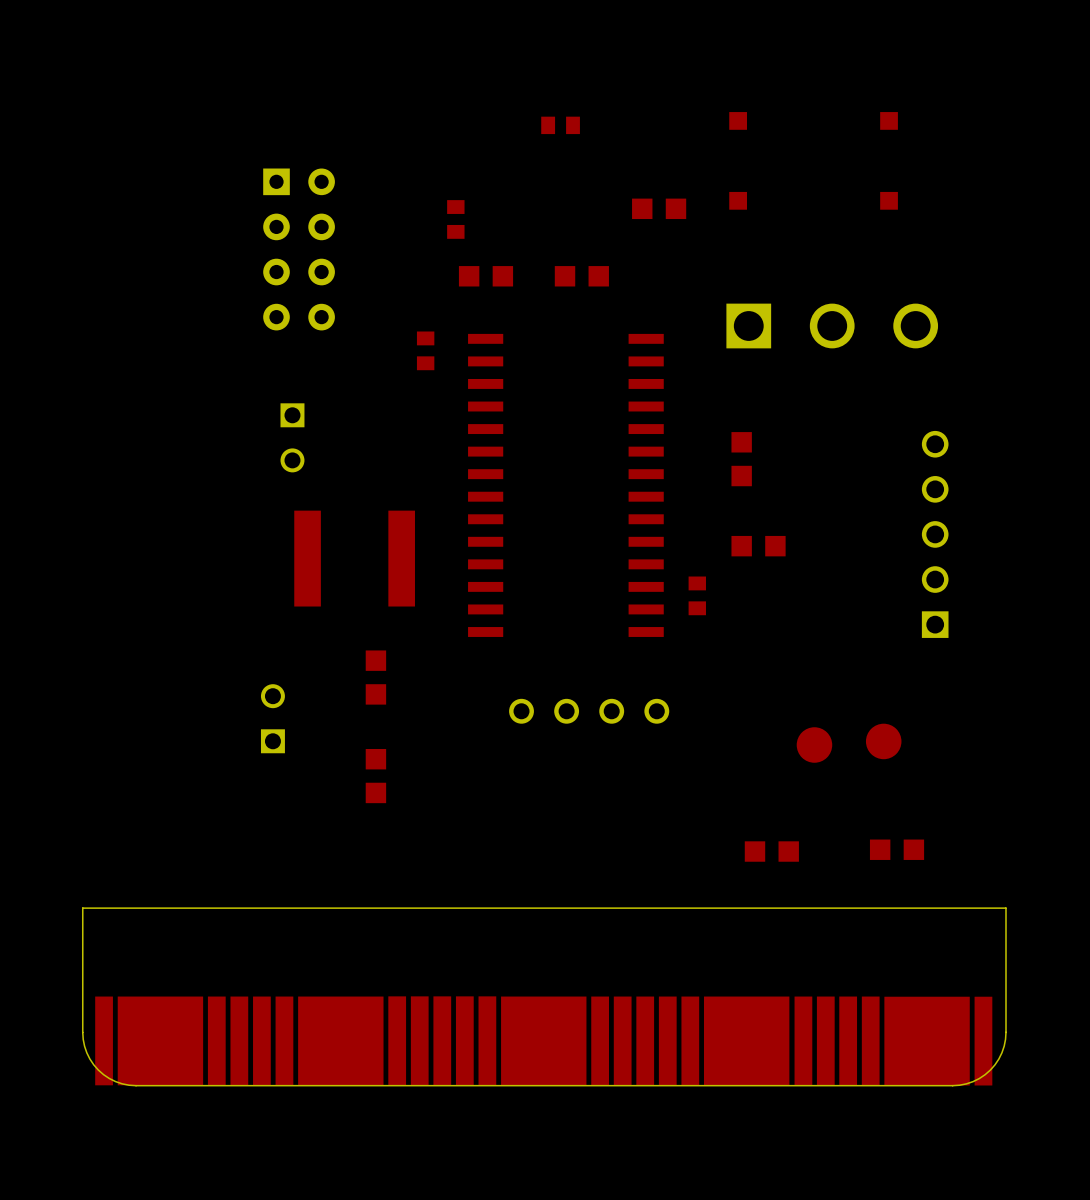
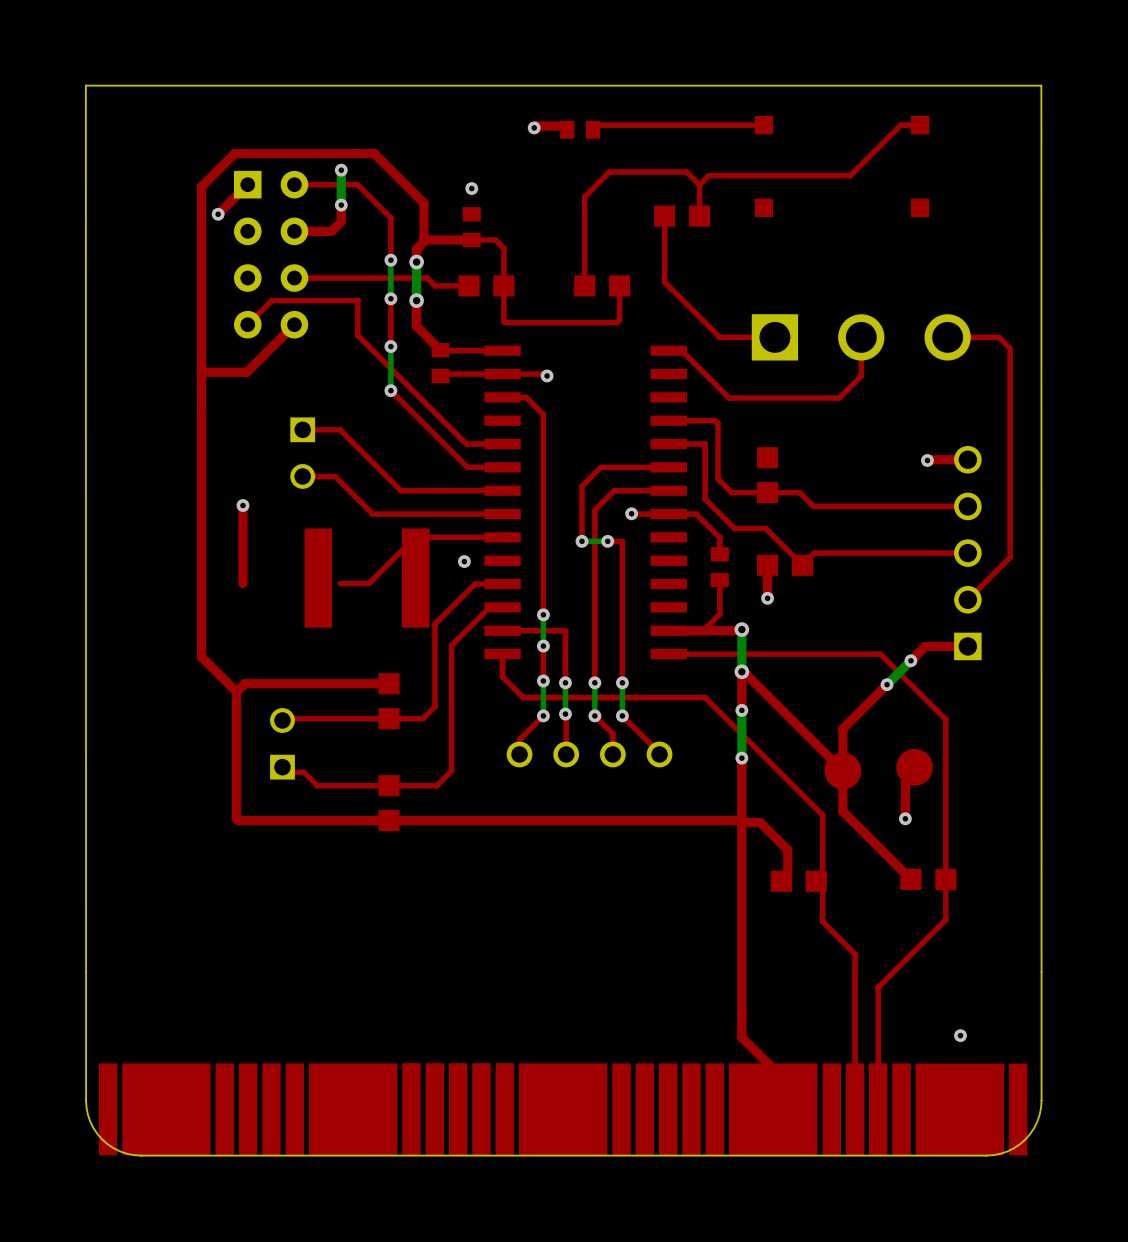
top track: none -> (763, 125) (593, 126)
top track: none -> (920, 125) (900, 125) (850, 175) (708, 175) (699, 184)
top track: none -> (567, 126) (536, 126) (534, 127)
via: none -> (534, 127)
bottom track: none -> (341, 170) (341, 205)
via: none -> (341, 170)
top track: none -> (247, 184) (218, 214)
top track: none -> (294, 184) (357, 184) (390, 217) (390, 260)
top track: none -> (699, 184) (686, 172) (609, 172) (584, 196) (584, 285)
top track: none -> (699, 184) (699, 216)
via: none -> (471, 188)
top track: none -> (341, 205) (341, 221) (331, 231) (294, 231)
via: none -> (341, 205)
via: none -> (218, 214)
top track: none -> (664, 216) (664, 282) (719, 337) (774, 337)
top track: none -> (425, 239) (416, 249) (416, 262)
top track: none -> (425, 239) (423, 238) (423, 203) (374, 153) (234, 153) (201, 186) (201, 657) (236, 692)
top track: none -> (425, 239) (495, 239) (503, 248) (504, 322) (616, 322) (619, 319) (619, 285)
part position: (299, 249) -> (271, 254)
bottom track: none -> (390, 260) (390, 298)
via: none -> (390, 260)
bottom track: none -> (416, 262) (416, 300)
via: none -> (416, 262)
top track: none -> (294, 278) (427, 278) (435, 285) (468, 285)
part position: (486, 276) -> (486, 285)
top track: none -> (390, 298) (390, 346)
via: none -> (390, 298)
top track: none -> (416, 300) (416, 326) (440, 350) (502, 350)
via: none -> (416, 300)
top track: none -> (247, 324) (271, 300) (357, 300) (357, 335) (466, 444) (502, 444)
top track: none -> (294, 324) (246, 372) (201, 372)
top track: none -> (861, 337) (861, 375) (839, 398) (729, 398) (681, 350) (668, 350)
top track: none -> (947, 337) (999, 337) (1010, 348) (1010, 557) (967, 599)
bottom track: none -> (390, 346) (390, 390)
via: none -> (390, 346)
top track: none -> (547, 375) (545, 374) (442, 374) (440, 375)
via: none -> (547, 375)
top track: none -> (390, 390) (467, 467) (502, 467)
via: none -> (390, 390)
top track: none -> (503, 398) (526, 397) (543, 414) (543, 614)
top track: none -> (668, 420) (714, 420) (717, 423) (717, 478) (731, 492) (799, 492) (813, 506) (967, 506)
top track: none -> (302, 429) (340, 429) (400, 490) (502, 490)
top track: none -> (668, 444) (705, 444) (705, 499) (734, 528) (765, 528) (802, 565) (814, 553) (967, 553)
via: none -> (927, 460)
top track: none -> (967, 459) (927, 460)
top track: none -> (668, 467) (600, 467) (582, 486) (582, 541)
top track: none -> (302, 476) (335, 476) (372, 514) (502, 514)
top track: none -> (668, 490) (614, 490) (594, 510) (594, 682)
top track: none -> (243, 504) (242, 583)
via: none -> (242, 505)
top track: none -> (631, 513) (696, 514) (719, 537) (719, 554)
via: none -> (631, 513)
top track: none -> (502, 537) (415, 537) (368, 583) (340, 583)
via: none -> (582, 541)
top track: none -> (607, 541) (622, 541) (622, 682)
bottom track: none -> (607, 541) (582, 541)
via: none -> (607, 541)
via: none -> (464, 561)
top track: none -> (767, 565) (767, 598)
top track: none -> (719, 579) (719, 614) (703, 630)
top track: none -> (502, 584) (474, 584) (435, 624) (435, 706) (423, 718) (289, 718) (282, 725)
via: none -> (767, 598)
top track: none -> (502, 607) (489, 607) (451, 645) (451, 771) (436, 785) (317, 785) (303, 772) (282, 772)
bottom track: none -> (543, 614) (543, 646)
via: none -> (543, 614)
part position: (697, 595) -> (719, 567)
top track: none -> (741, 629) (668, 630)
bottom track: none -> (741, 629) (741, 671)
via: none -> (741, 629)
top track: none -> (503, 631) (564, 630) (565, 682)
top track: none -> (543, 646) (543, 680)
via: none -> (543, 646)
top track: none -> (967, 646) (925, 646) (910, 660)
top track: none -> (502, 654) (502, 676) (523, 697) (705, 697) (822, 815) (822, 921) (855, 954) (855, 1109)
top track: none -> (668, 654) (880, 654) (945, 719) (945, 919) (877, 987) (878, 1109)
bottom track: none -> (910, 660) (887, 684)
via: none -> (910, 660)
via: none -> (741, 671)
bottom track: none -> (543, 680) (543, 715)
via: none -> (543, 680)
bottom track: none -> (565, 682) (565, 714)
via: none -> (565, 682)
bottom track: none -> (594, 682) (594, 715)
via: none -> (594, 682)
bottom track: none -> (622, 682) (622, 715)
via: none -> (622, 682)
top track: none -> (389, 683) (244, 683) (236, 692)
top track: none -> (887, 684) (842, 728) (842, 811) (910, 879)
via: none -> (887, 684)
top track: none -> (236, 692) (236, 818) (238, 820) (740, 820) (741, 822) (760, 822) (787, 850) (787, 879)
top track: none -> (741, 710) (741, 671) (743, 671) (842, 771) (846, 767)
bottom track: none -> (741, 710) (741, 758)
via: none -> (741, 710)
top track: none -> (565, 714) (566, 754)
via: none -> (565, 714)
top track: none -> (543, 715) (519, 739) (519, 754)
via: none -> (543, 715)
top track: none -> (594, 715) (612, 733) (612, 754) (616, 750)
via: none -> (594, 715)
top track: none -> (622, 715) (659, 753)
via: none -> (622, 715)
part position: (589, 711) -> (589, 754)
top track: none -> (741, 758) (741, 1037) (773, 1068) (773, 1109) (788, 1094)
via: none -> (741, 758)
top track: none -> (905, 771) (905, 818)
via: none -> (905, 818)
board edge: none -> (1041, 971) (1041, 85) (85, 85) (86, 971)
part: (544, 996) -> none
via: none -> (960, 1035)
part: none -> (563, 1063)

